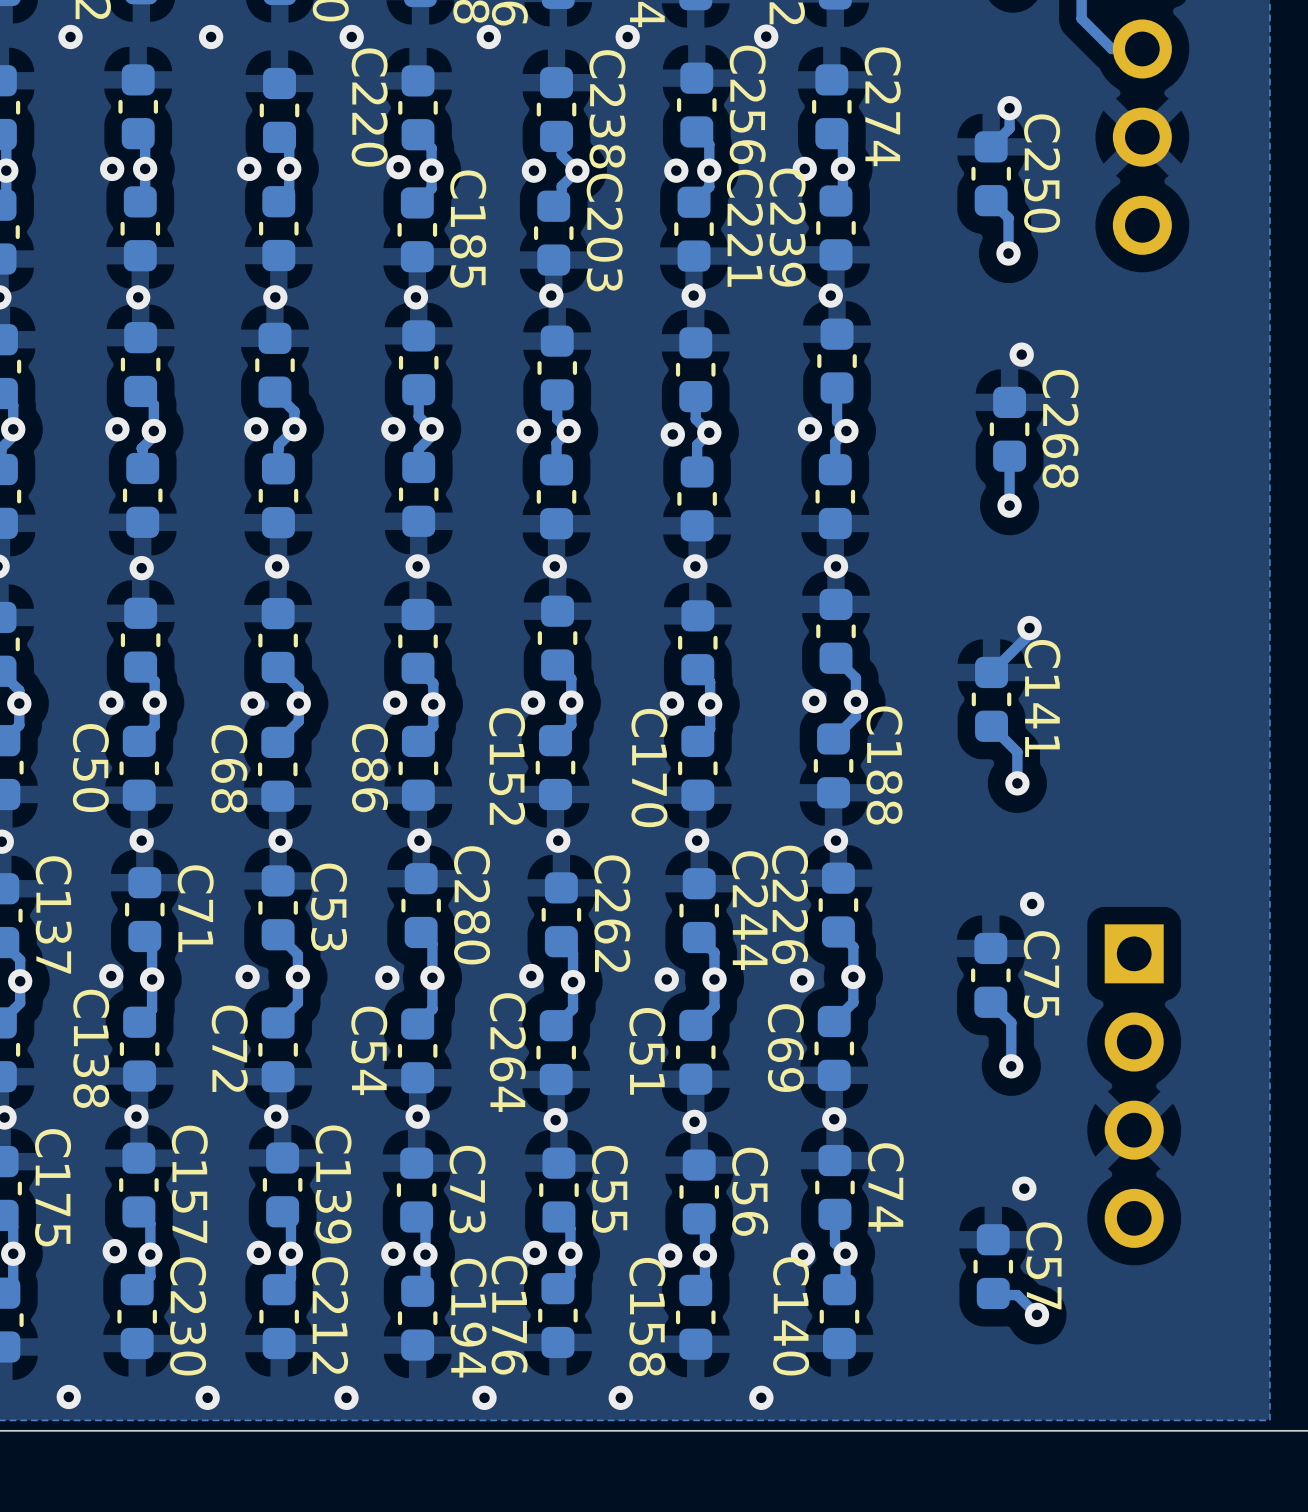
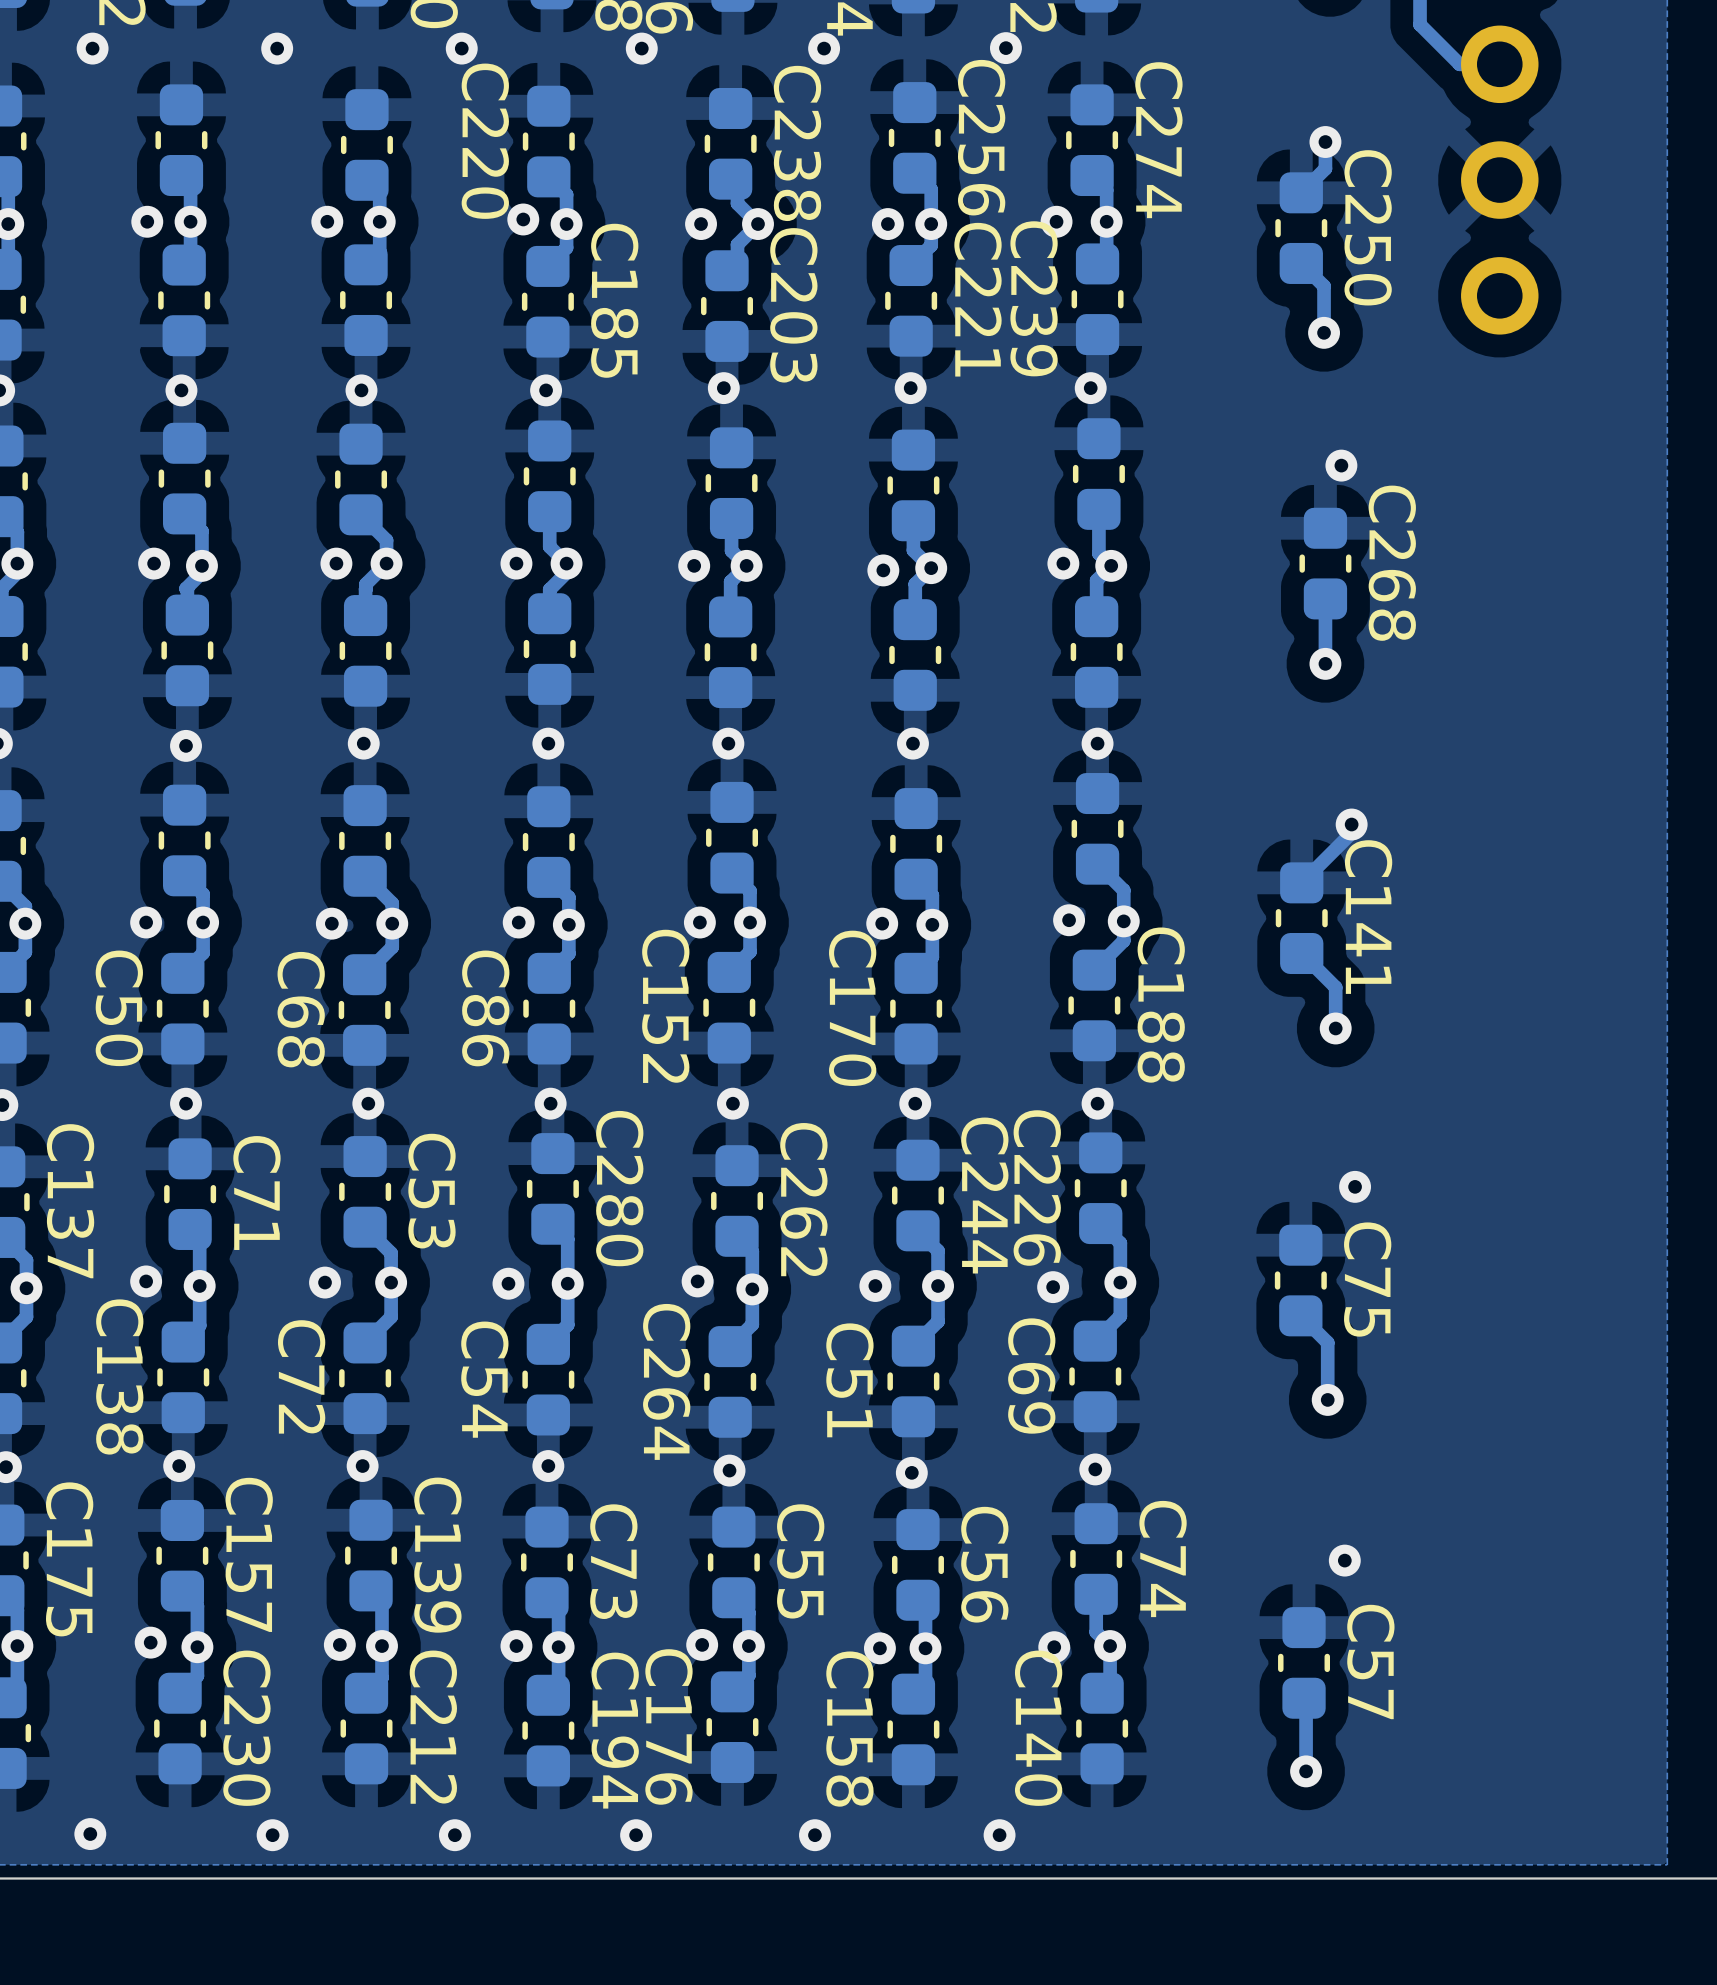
part: (1134, 1086) -> none
track: (994, 1295) (1017, 1295) (1037, 1314) -> (1306, 1700) (1306, 1771)
via position: (1037, 1314) -> (1306, 1771)

